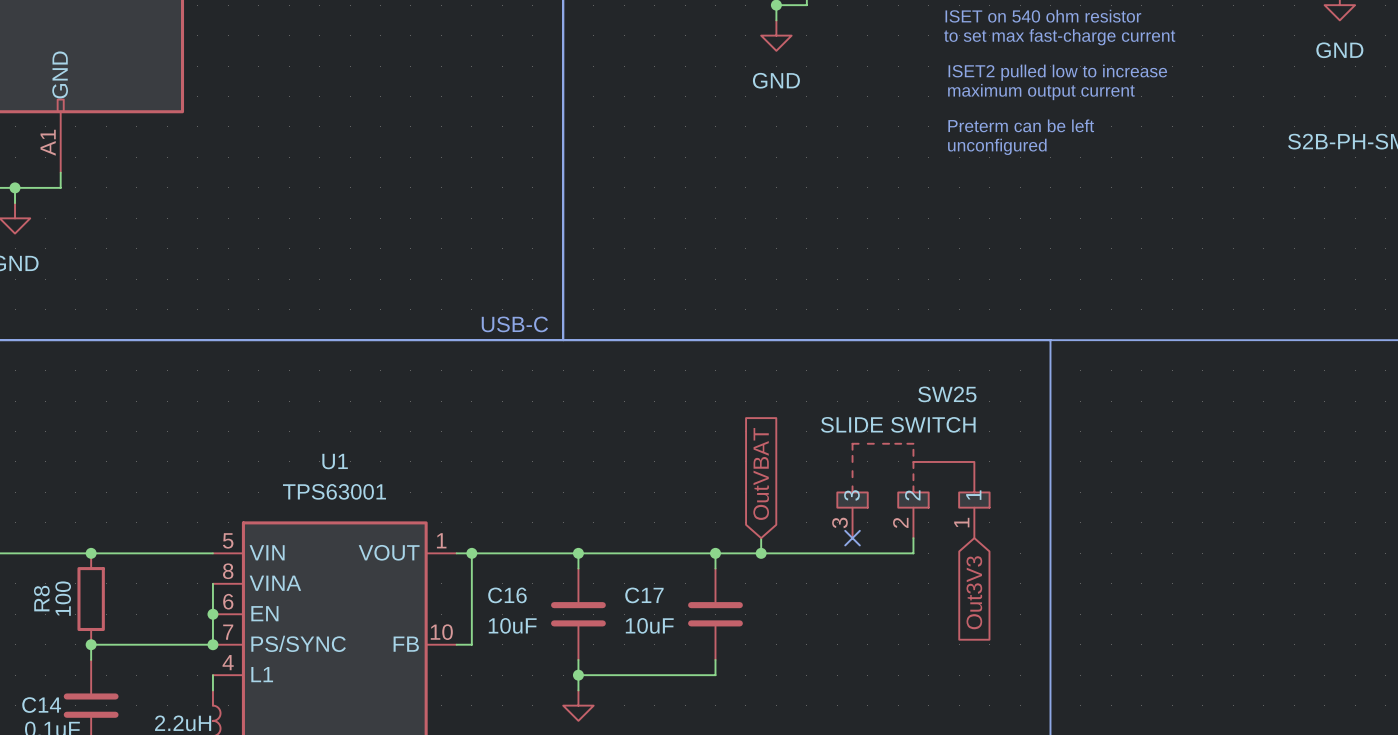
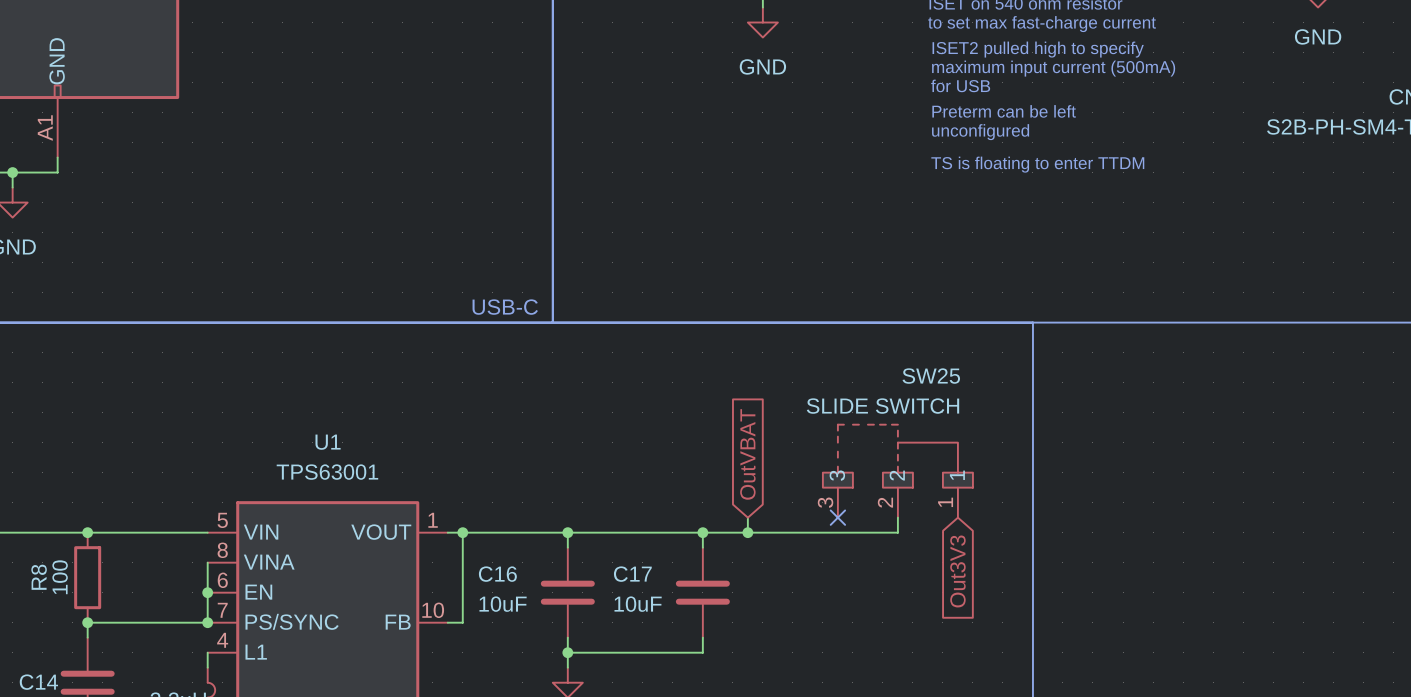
text: ISET2 pulled low to increase (1057, 72) -> ISET2 pulled high to specify (1038, 49)
text: maximum output current (1041, 92) -> maximum input current (500mA) (1053, 68)
text: none -> for USB (960, 85)
text: none -> TS is floating to enter TTDM (1037, 164)

